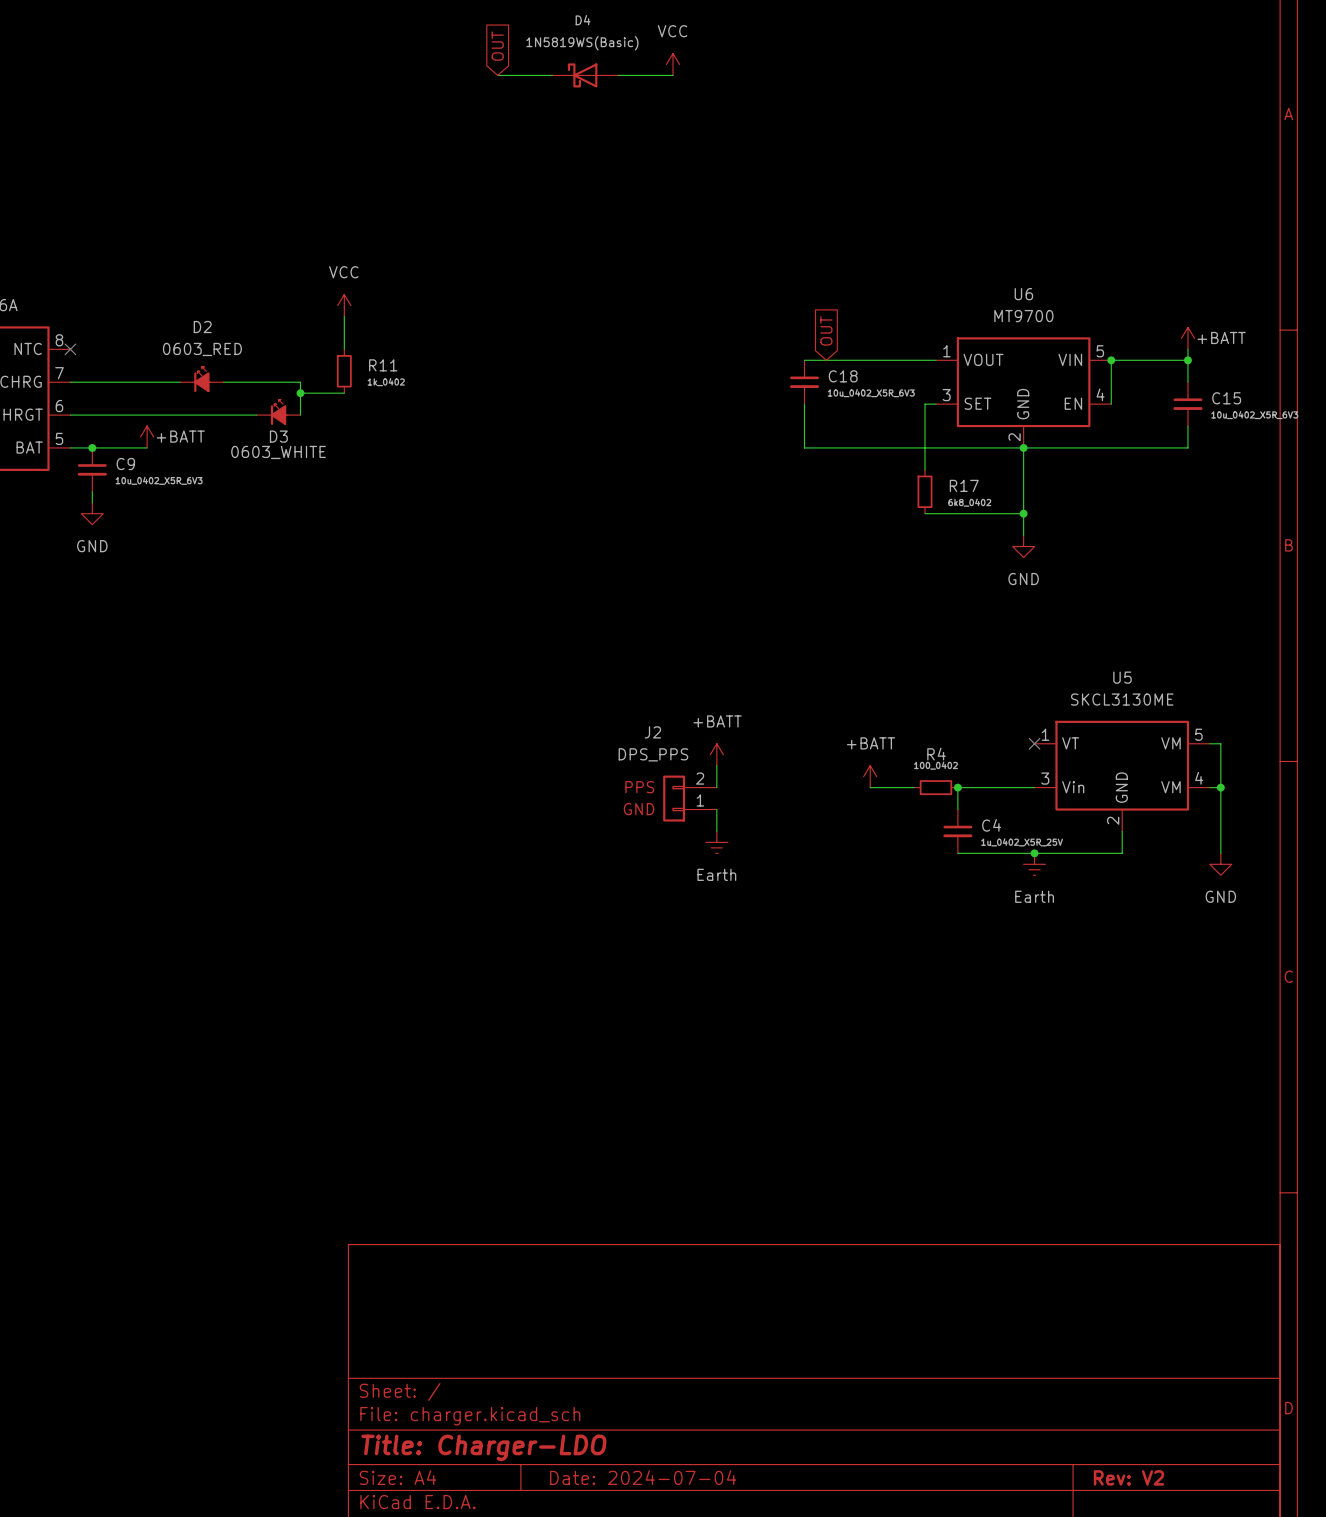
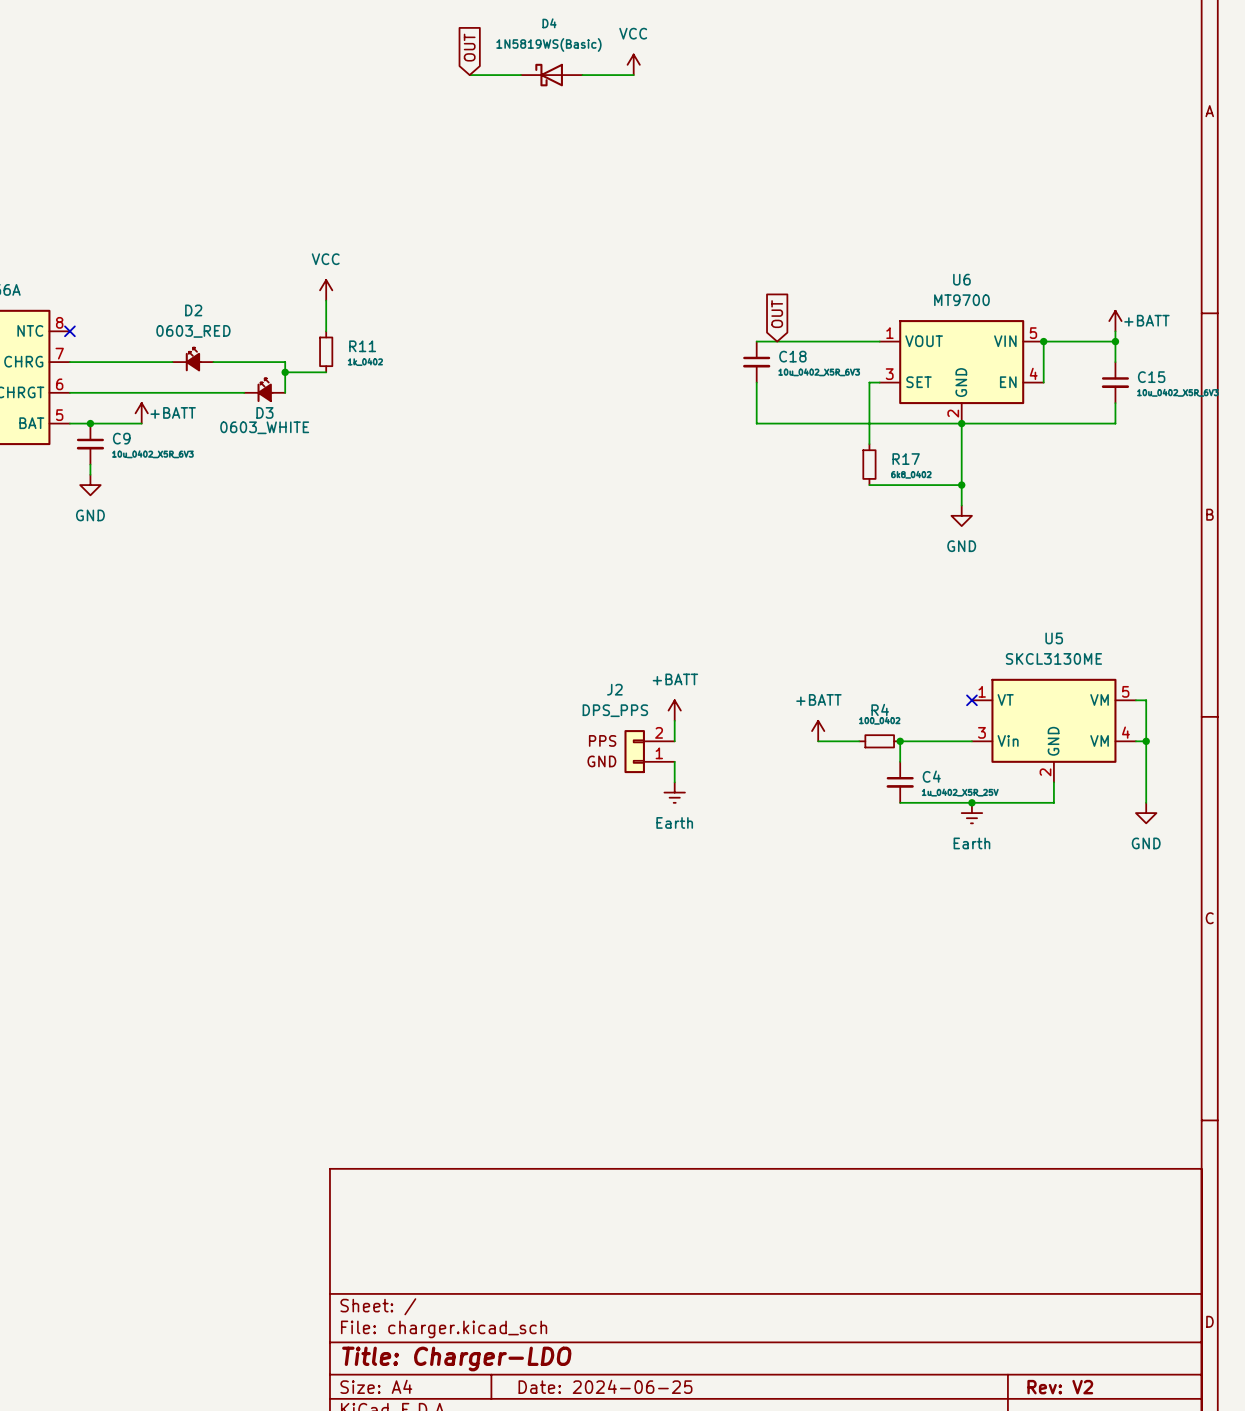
title block: Date: 2024-07-04 (643, 1477) -> Date: 2024-06-25 (605, 1386)

